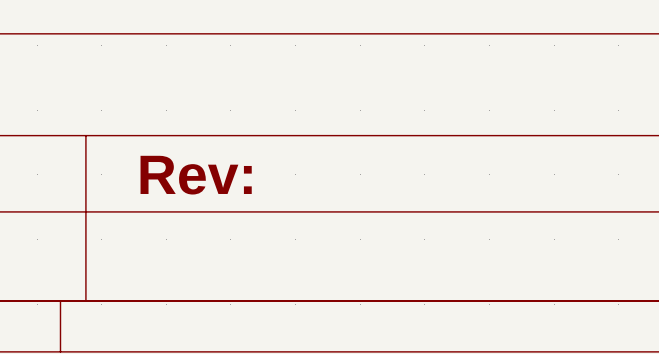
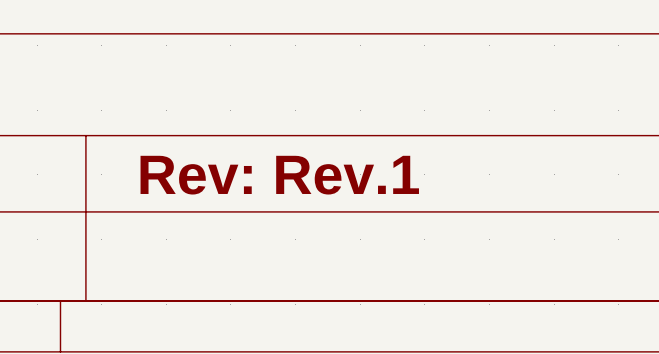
title block: Rev: (196, 175) -> Rev: Rev.1 (279, 175)

